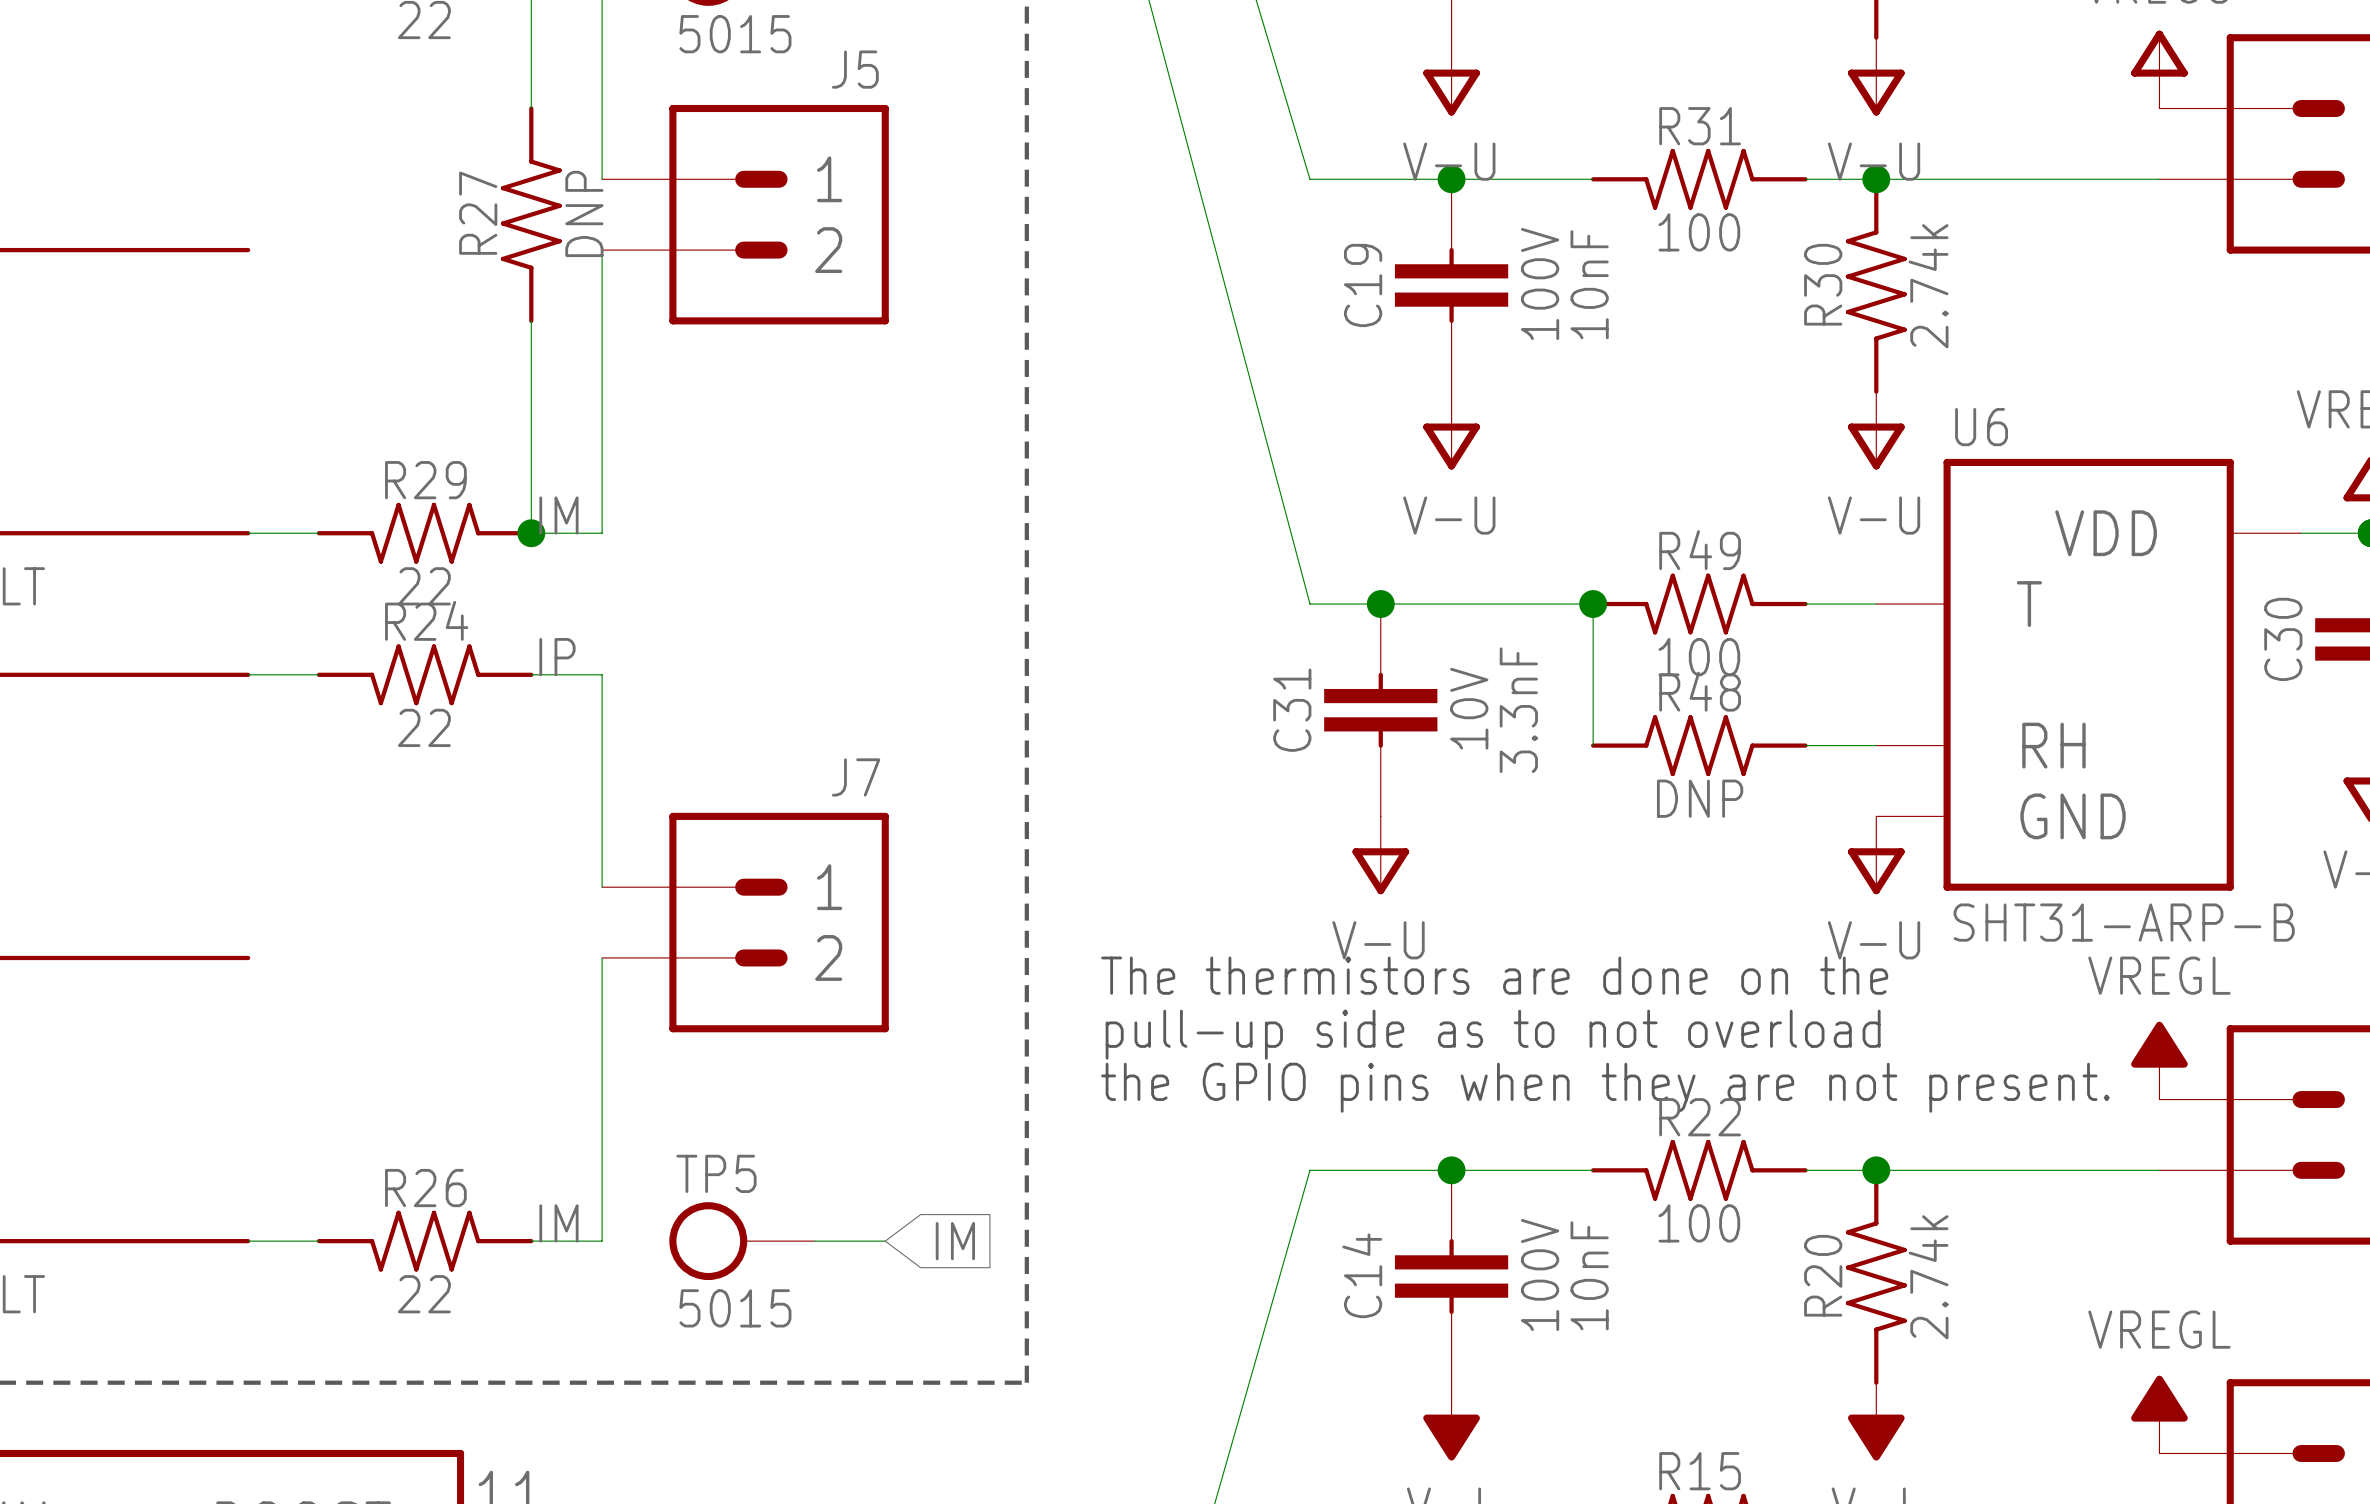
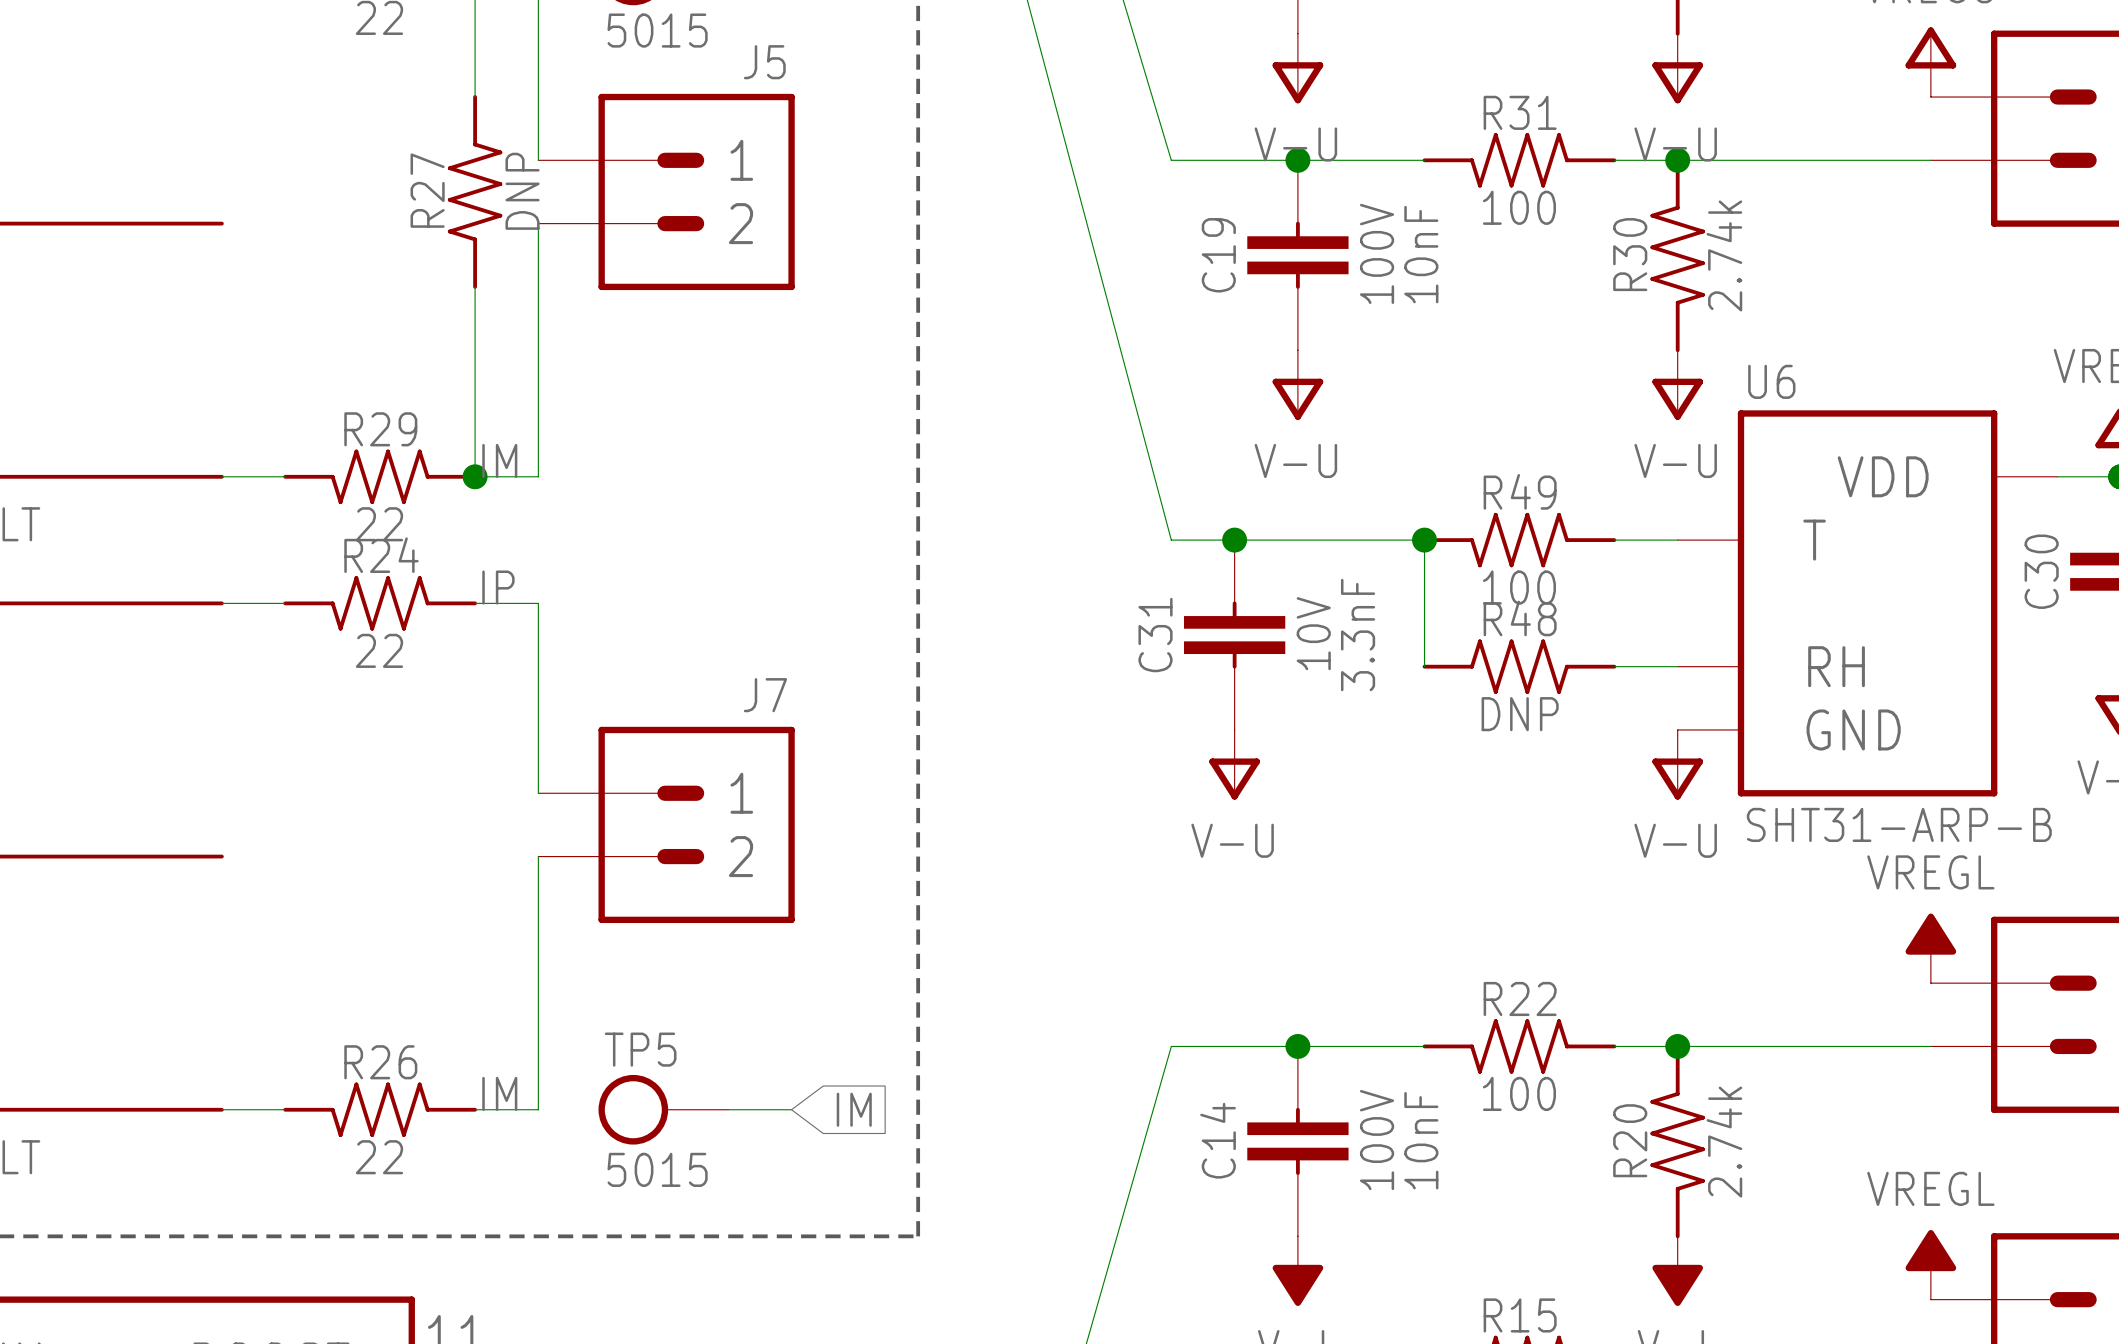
text: The thermistors are done on the (1494, 975) -> none
text: pull-up side as to not overload (1493, 1034) -> none
text: the GPIO pins when they are not present. (1605, 1087) -> none

